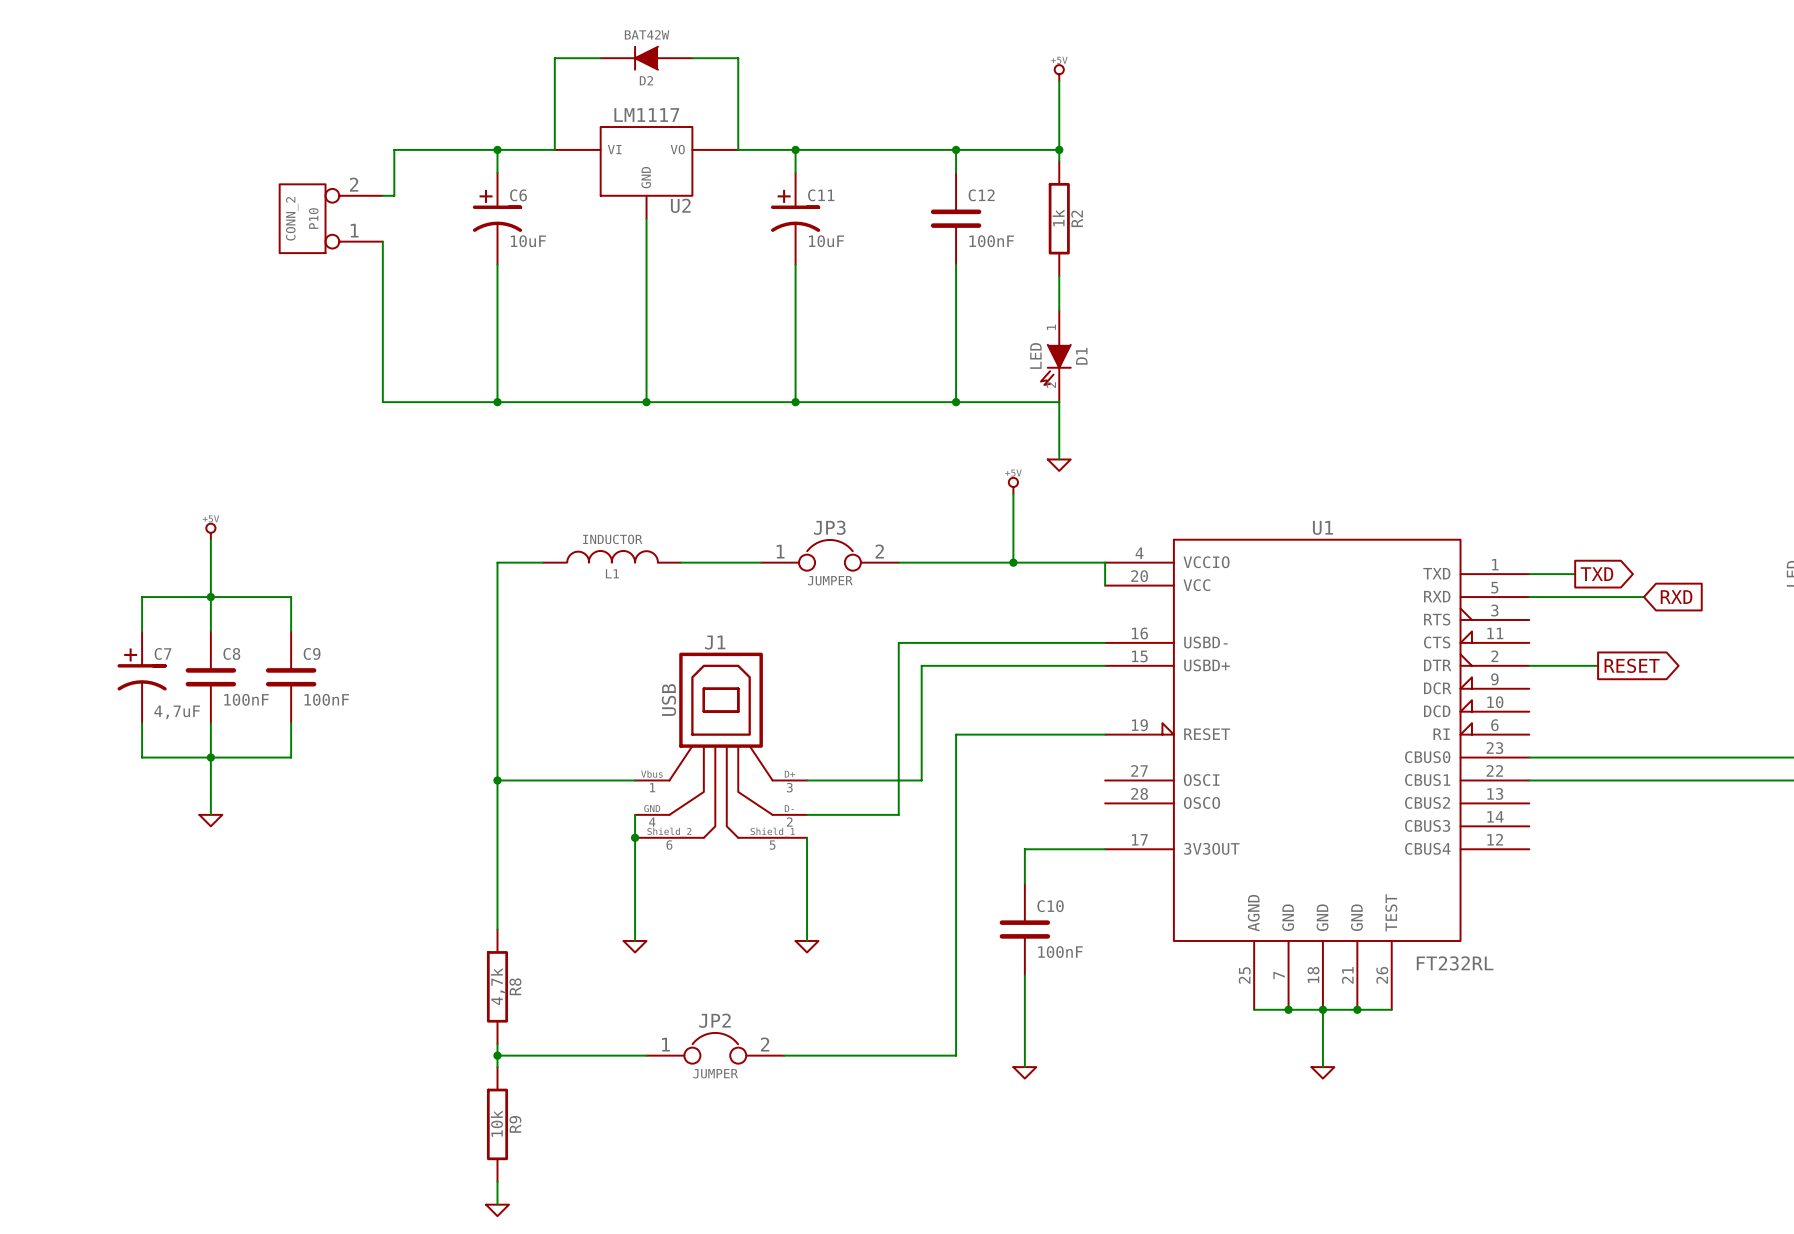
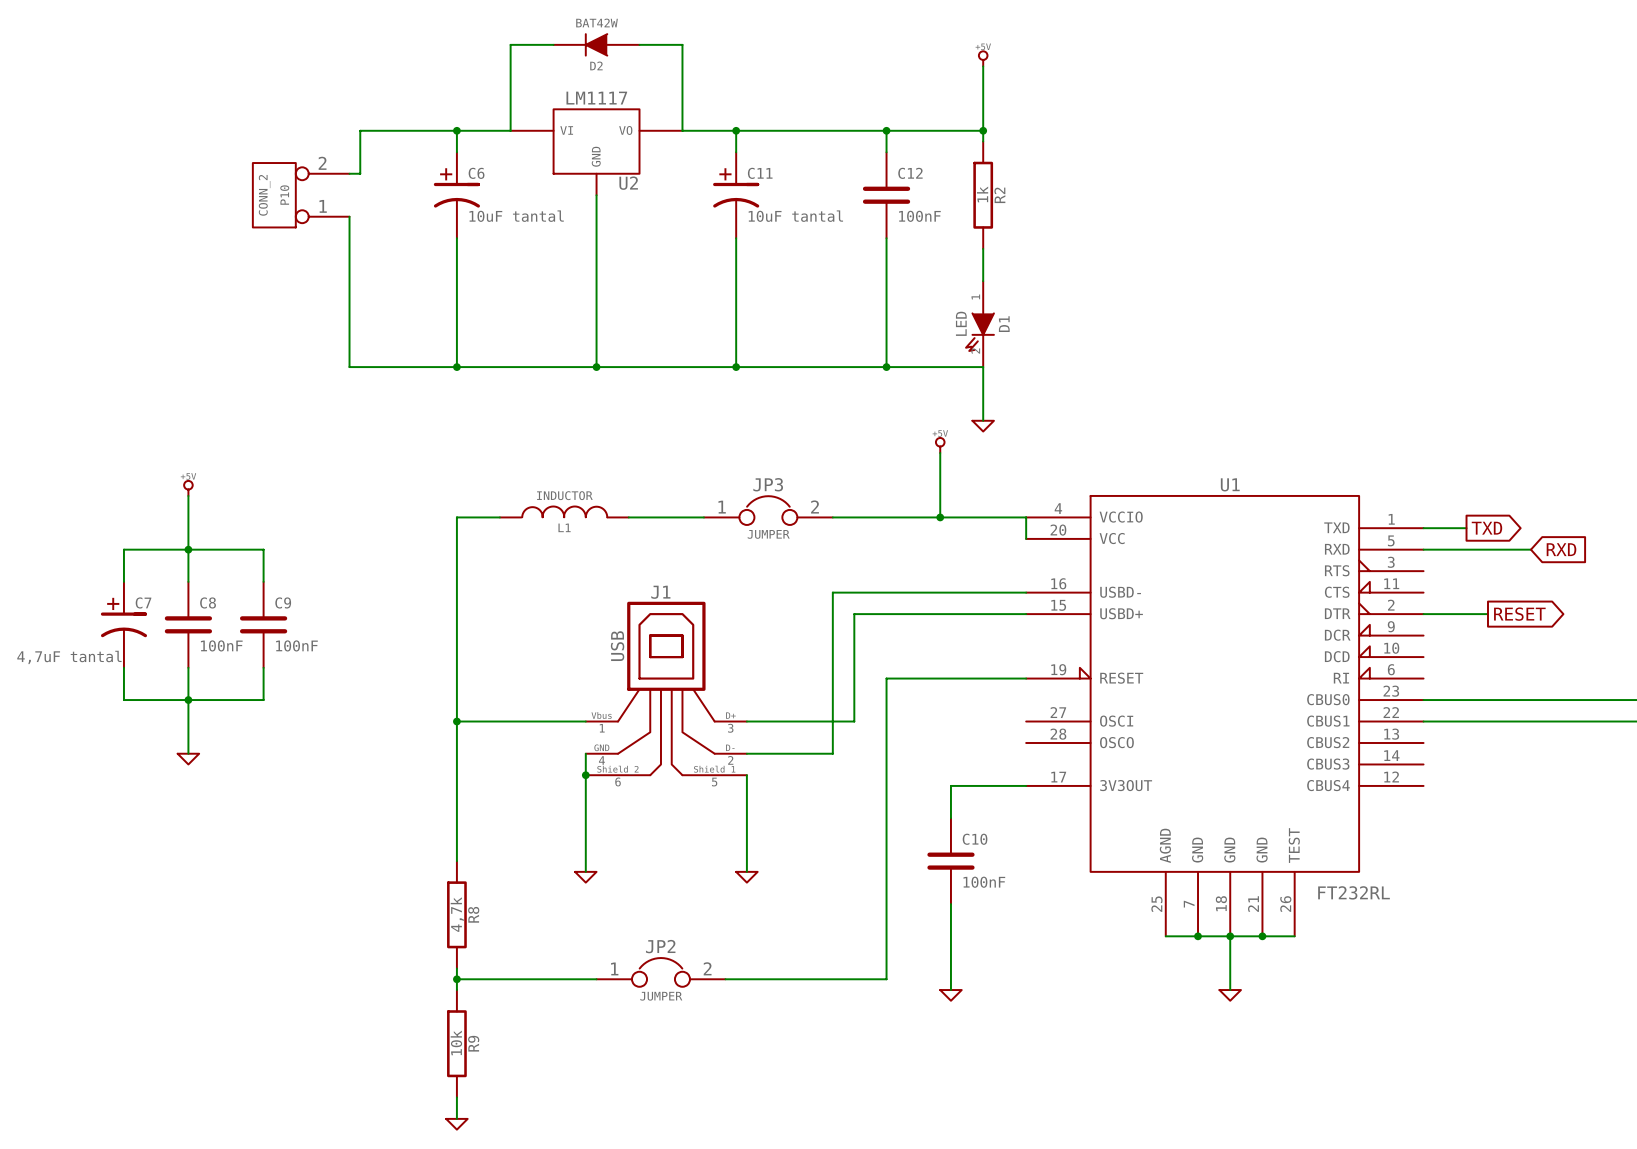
C6 value: 10uF (528, 241) -> 10uF tantal (516, 216)
C11 value: 10uF (826, 241) -> 10uF tantal (795, 216)
C7 value: 4,7uF (177, 712) -> 4,7uF tantal (69, 657)

